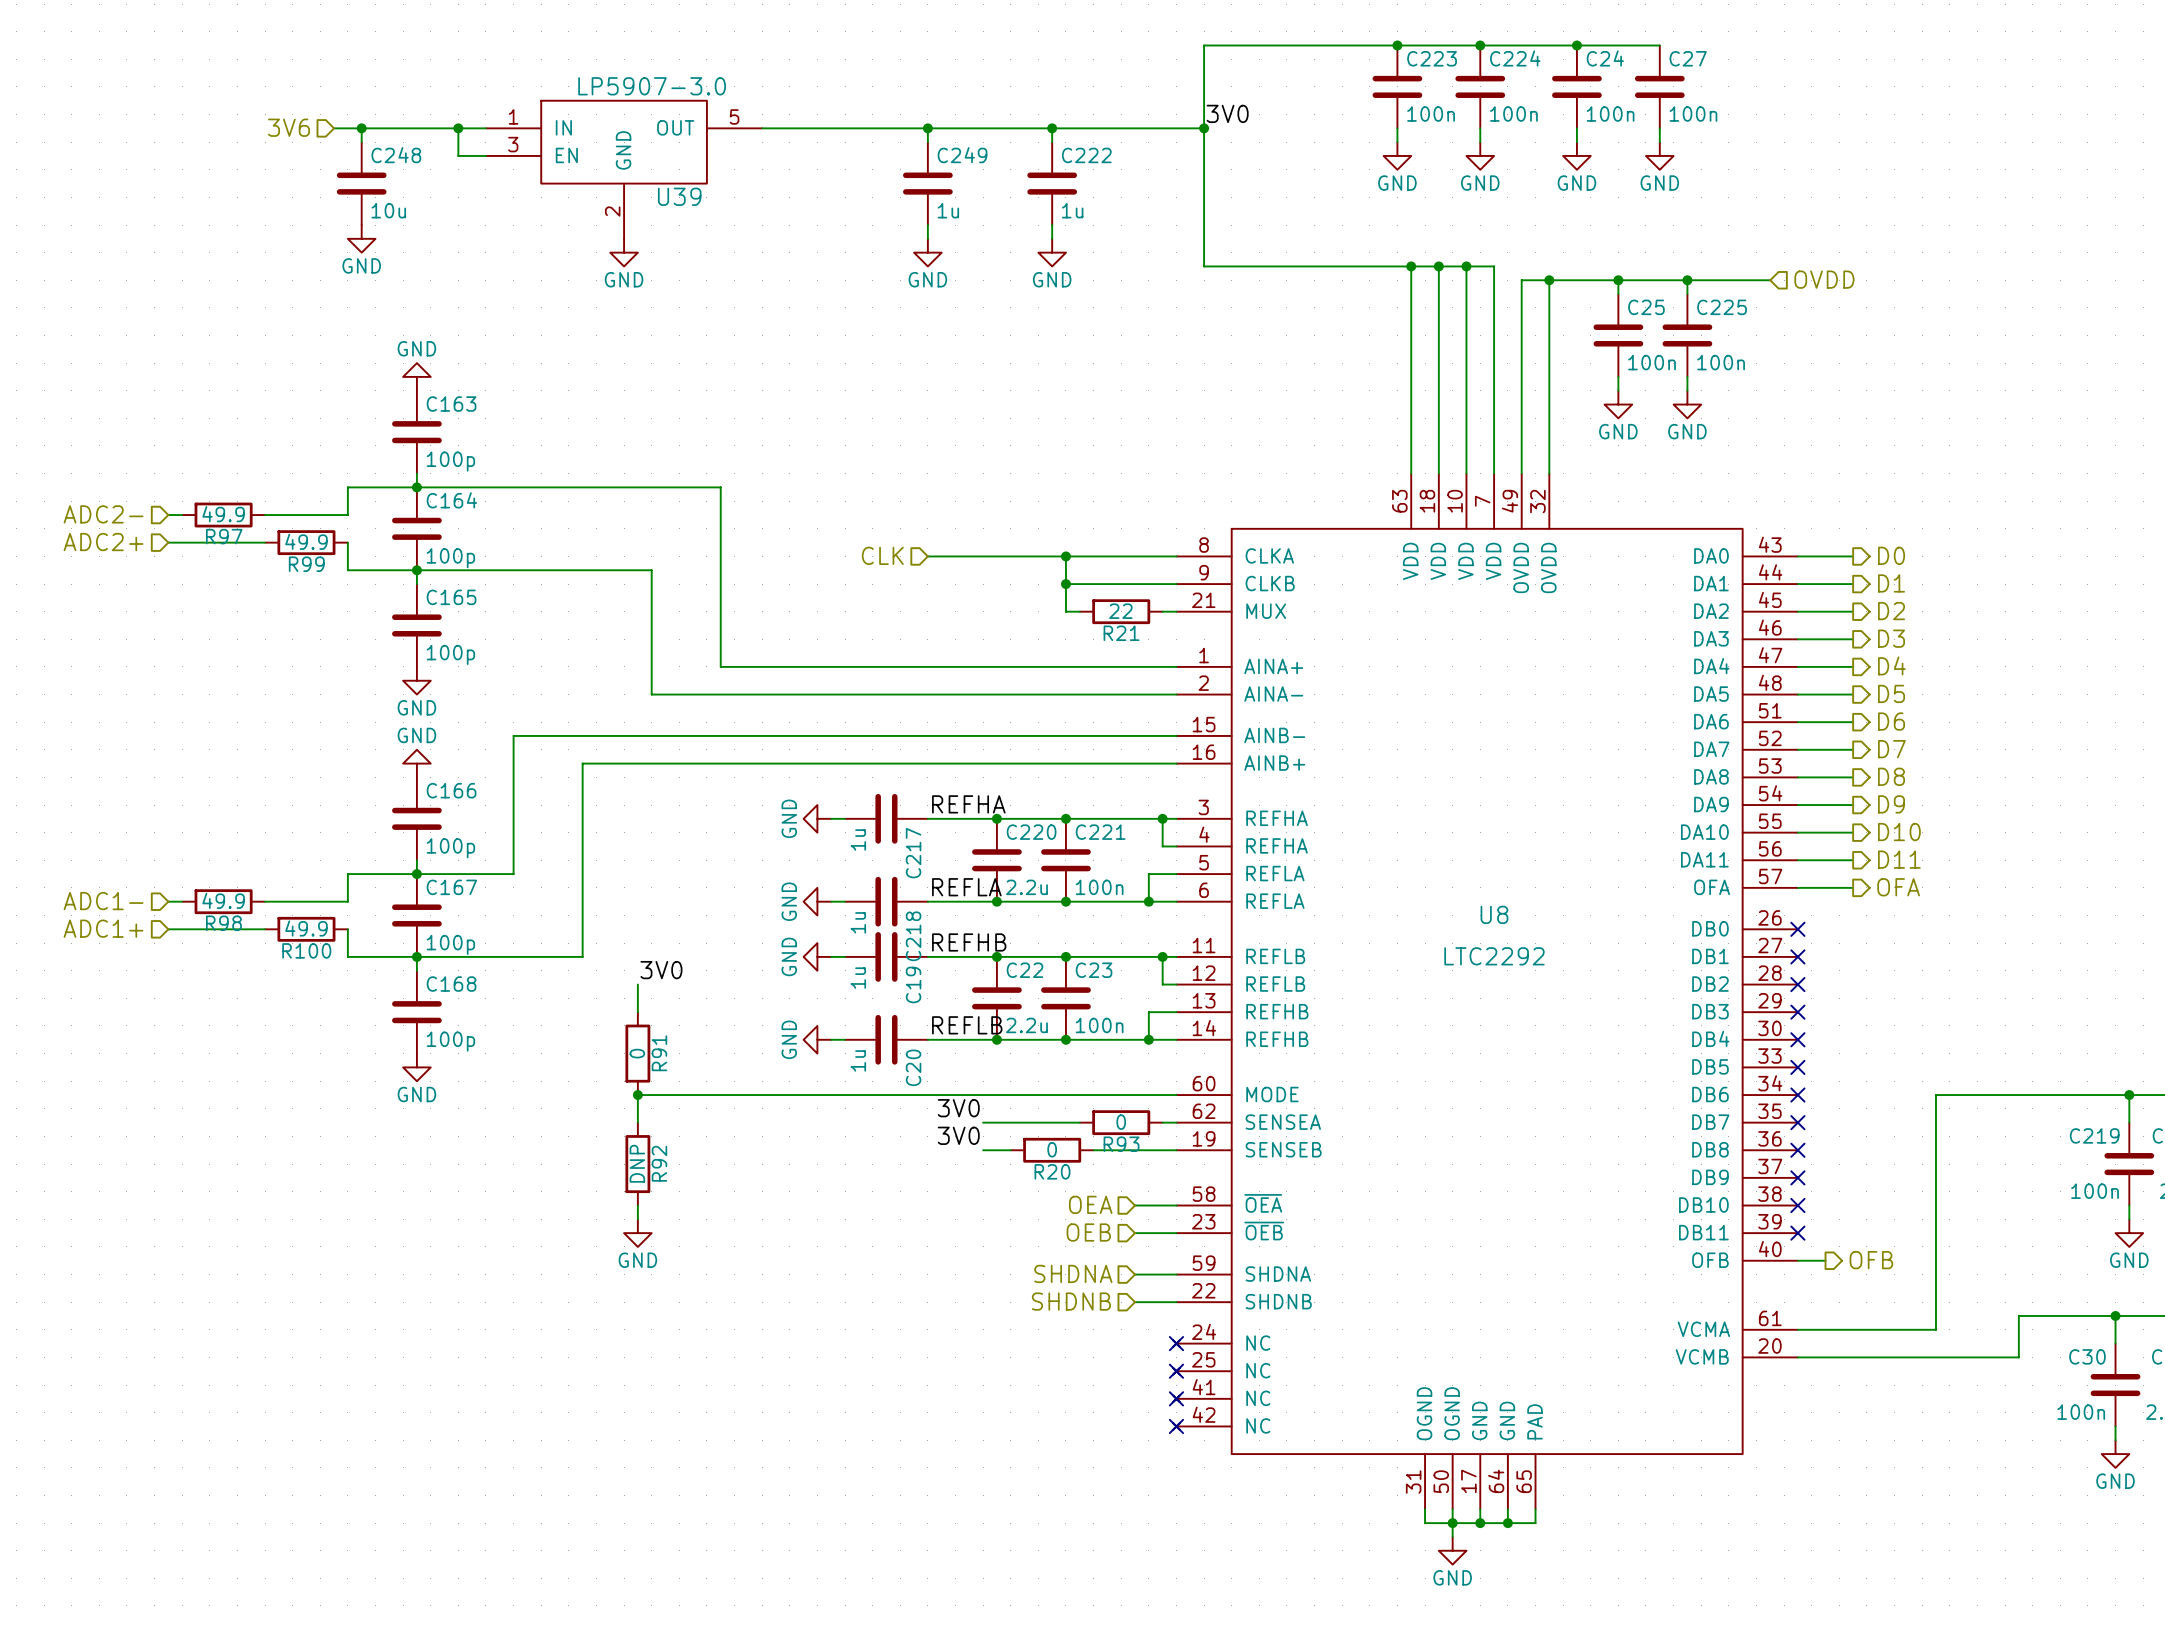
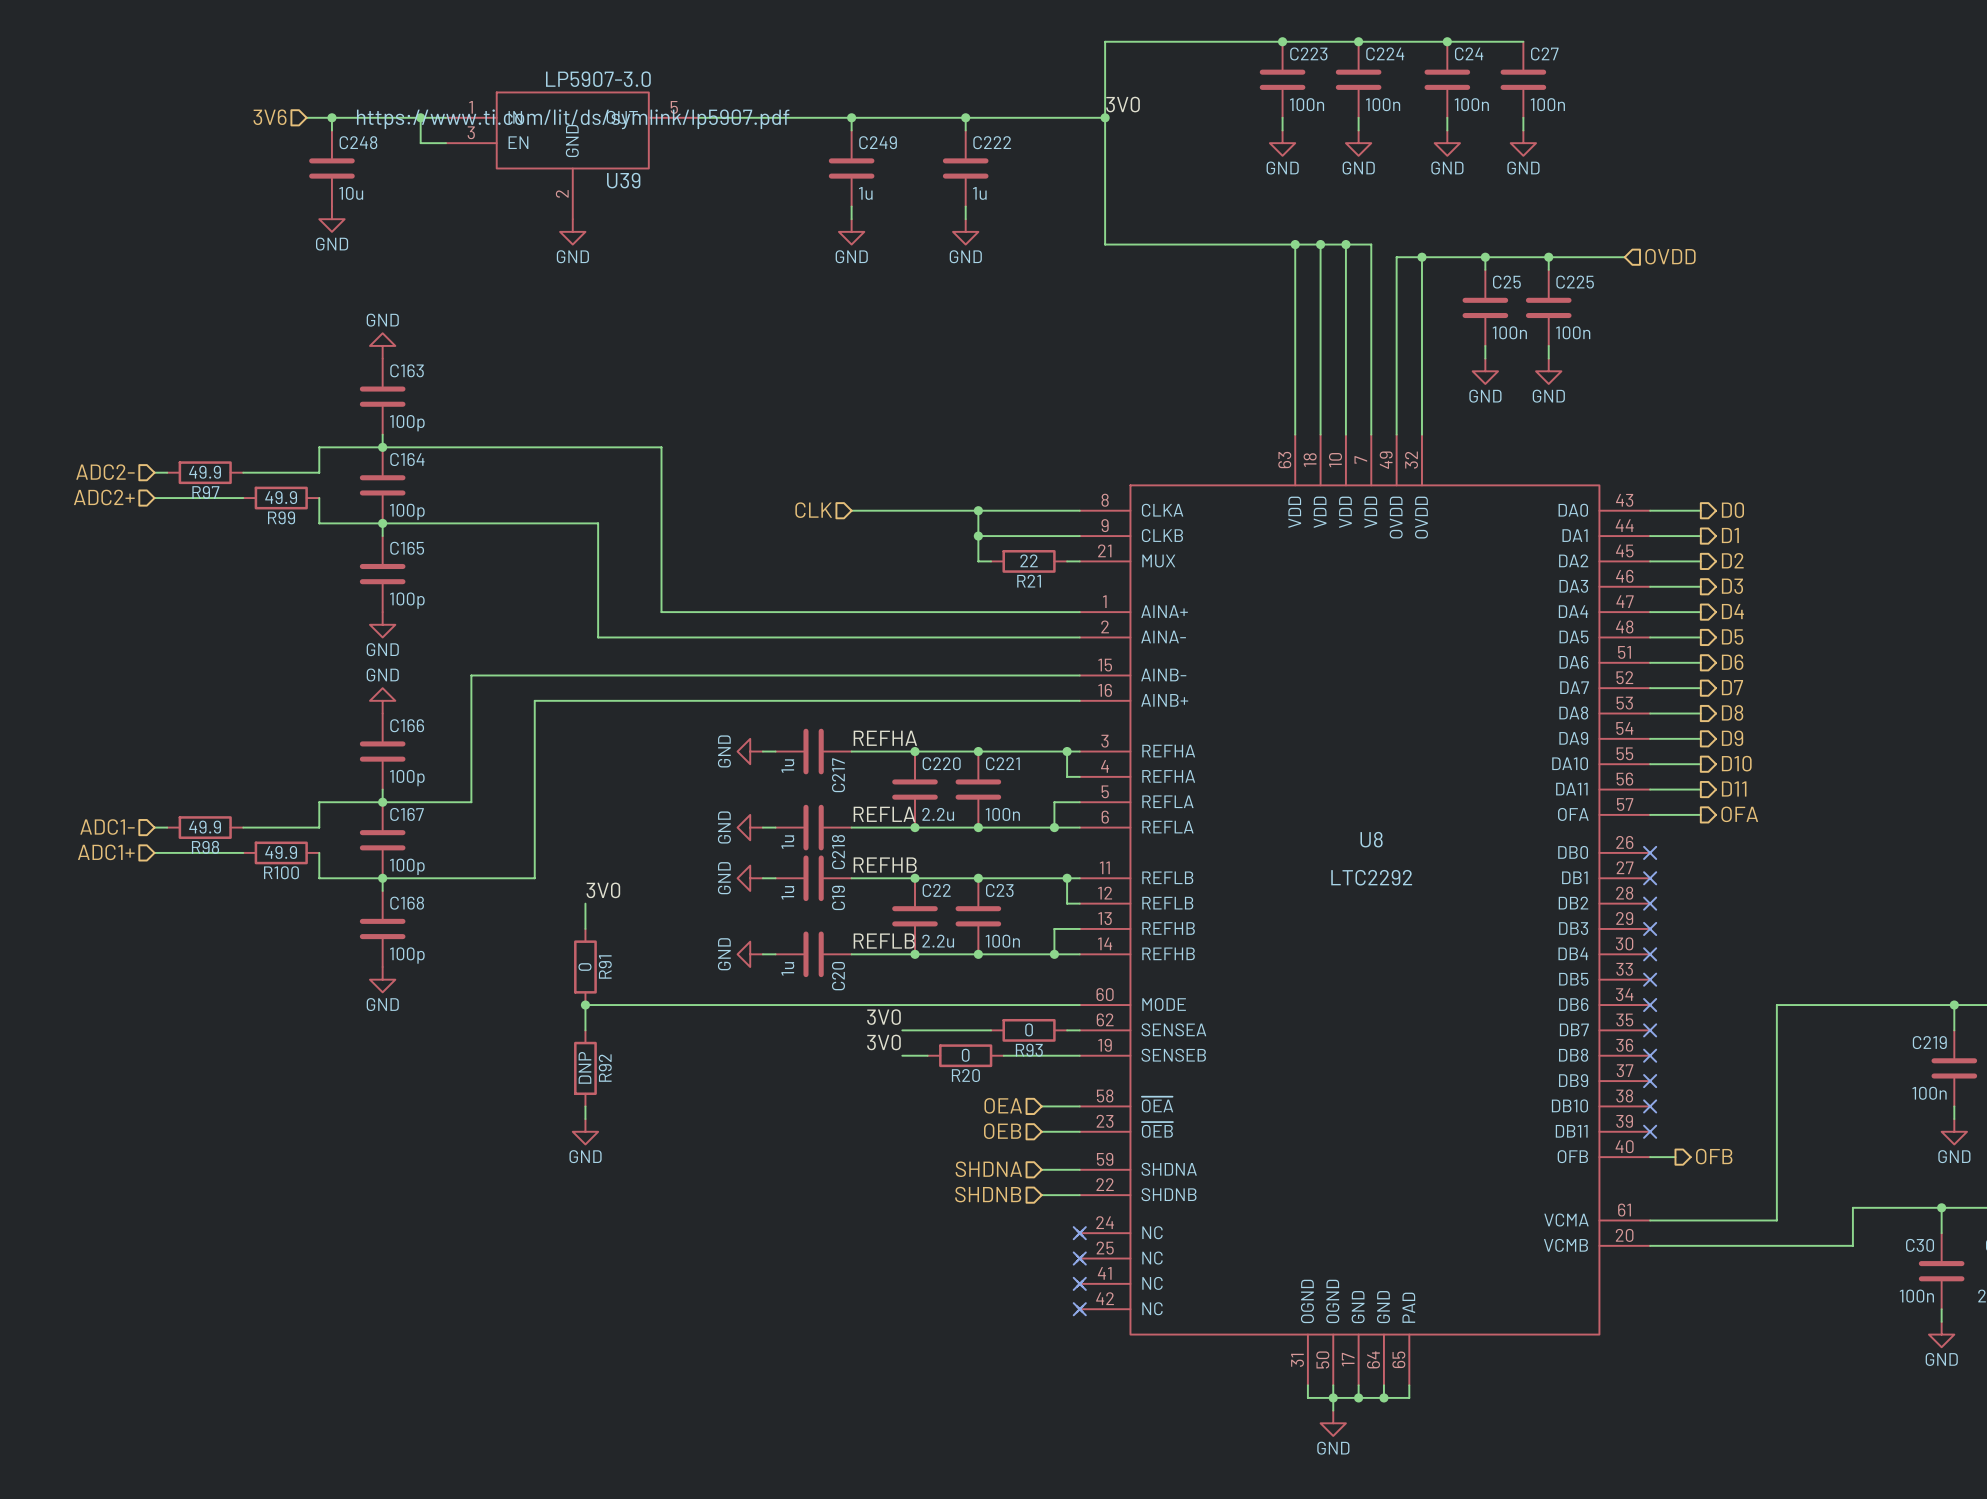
U39 text: none -> https://www.ti.com/lit/ds/symlink/lp5907.pdf (573, 119)

